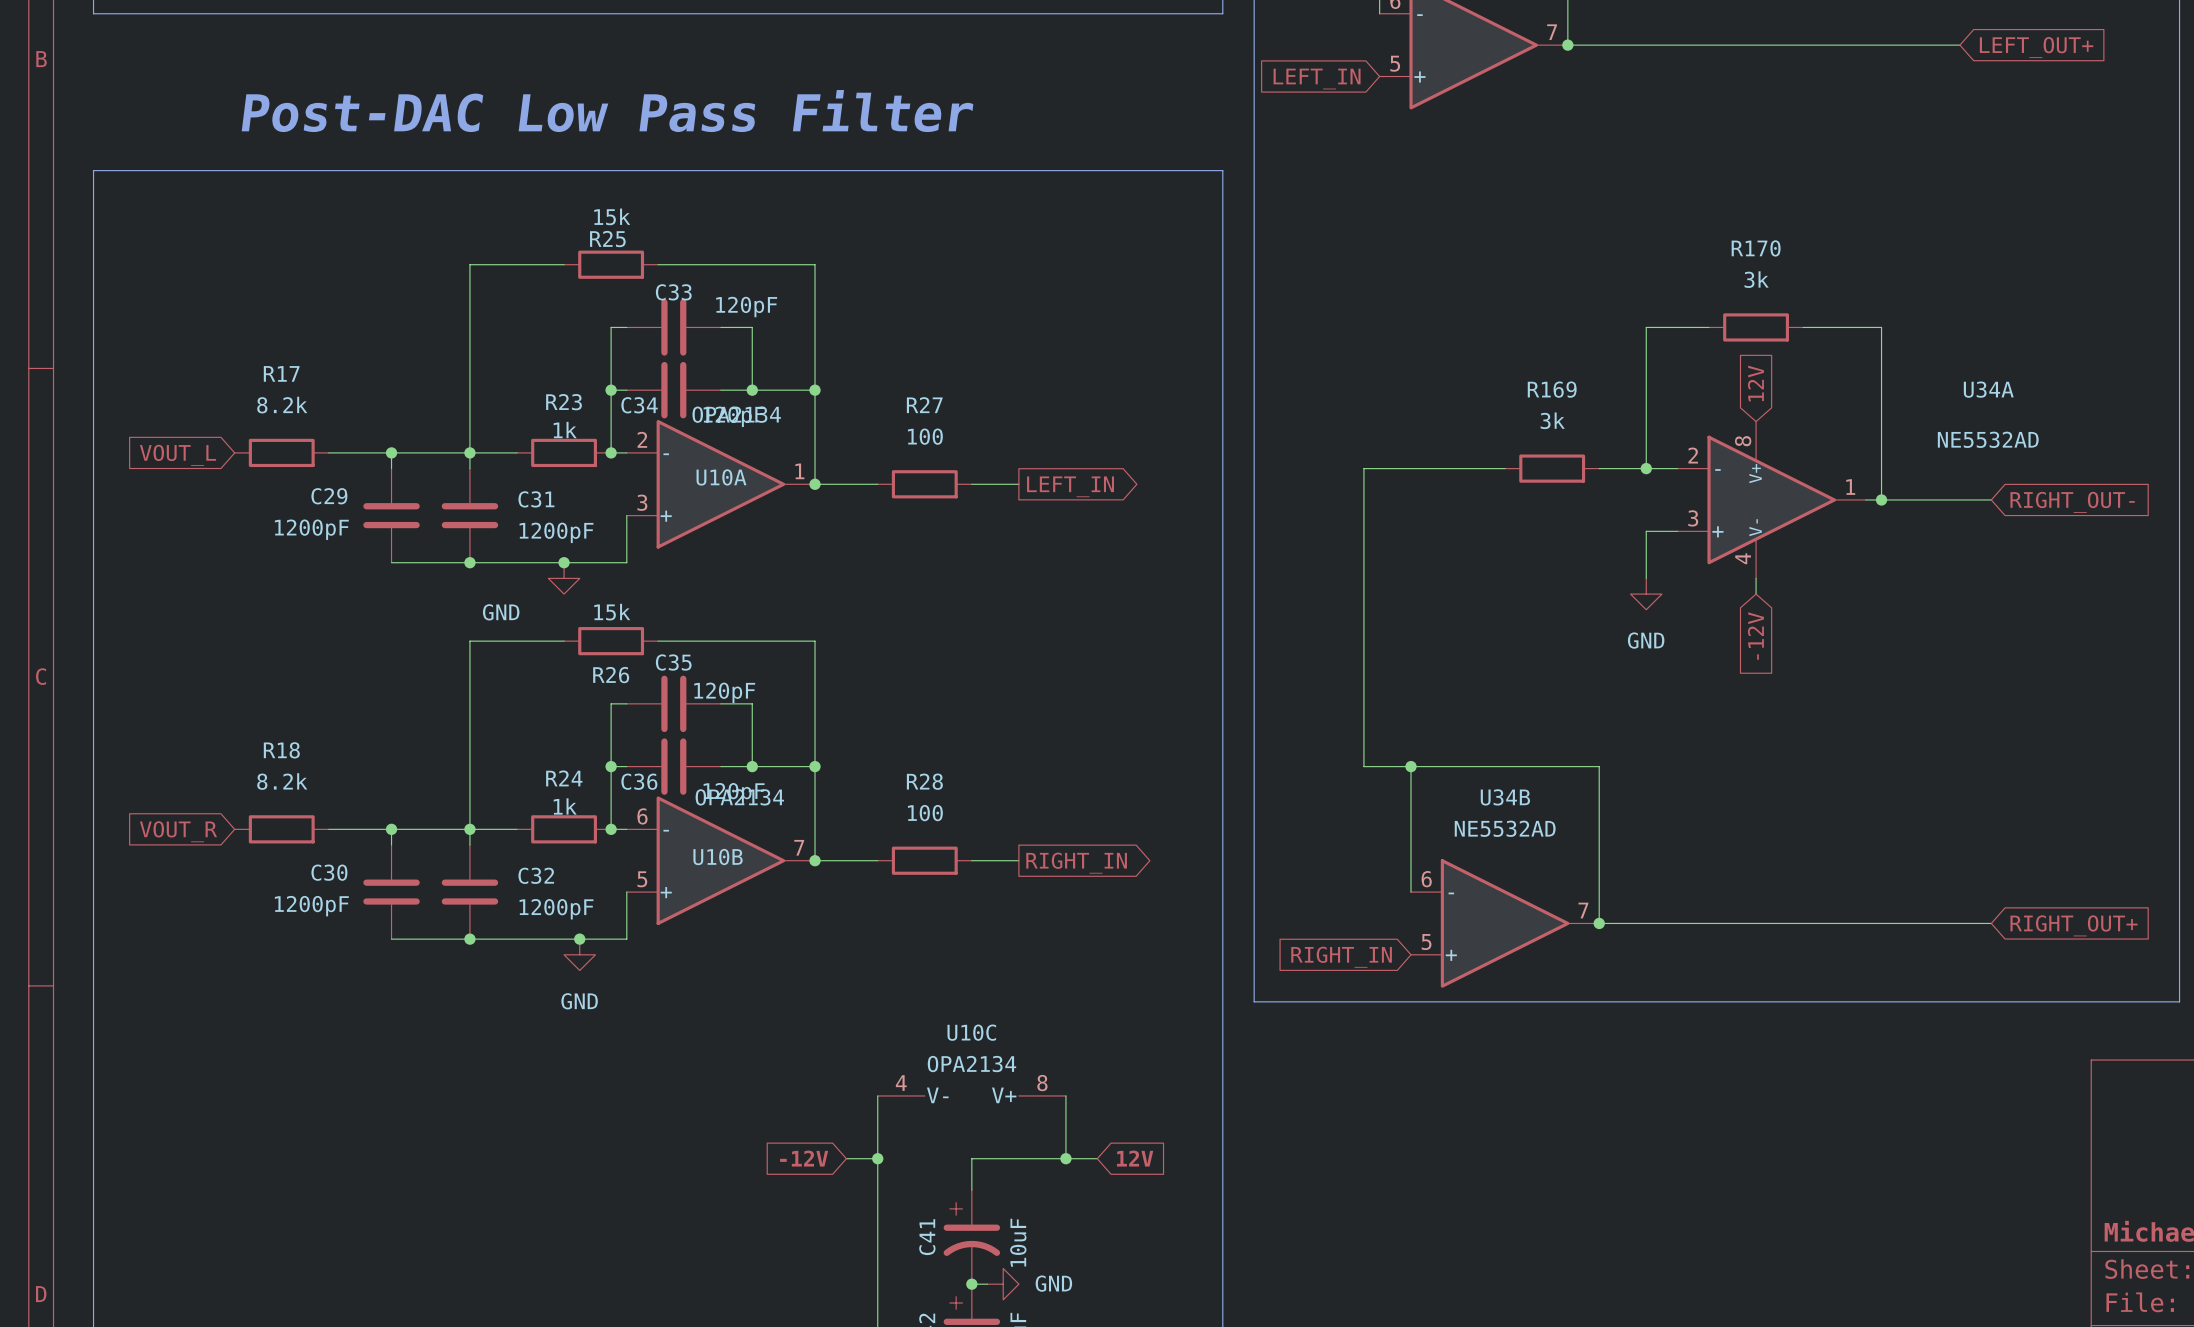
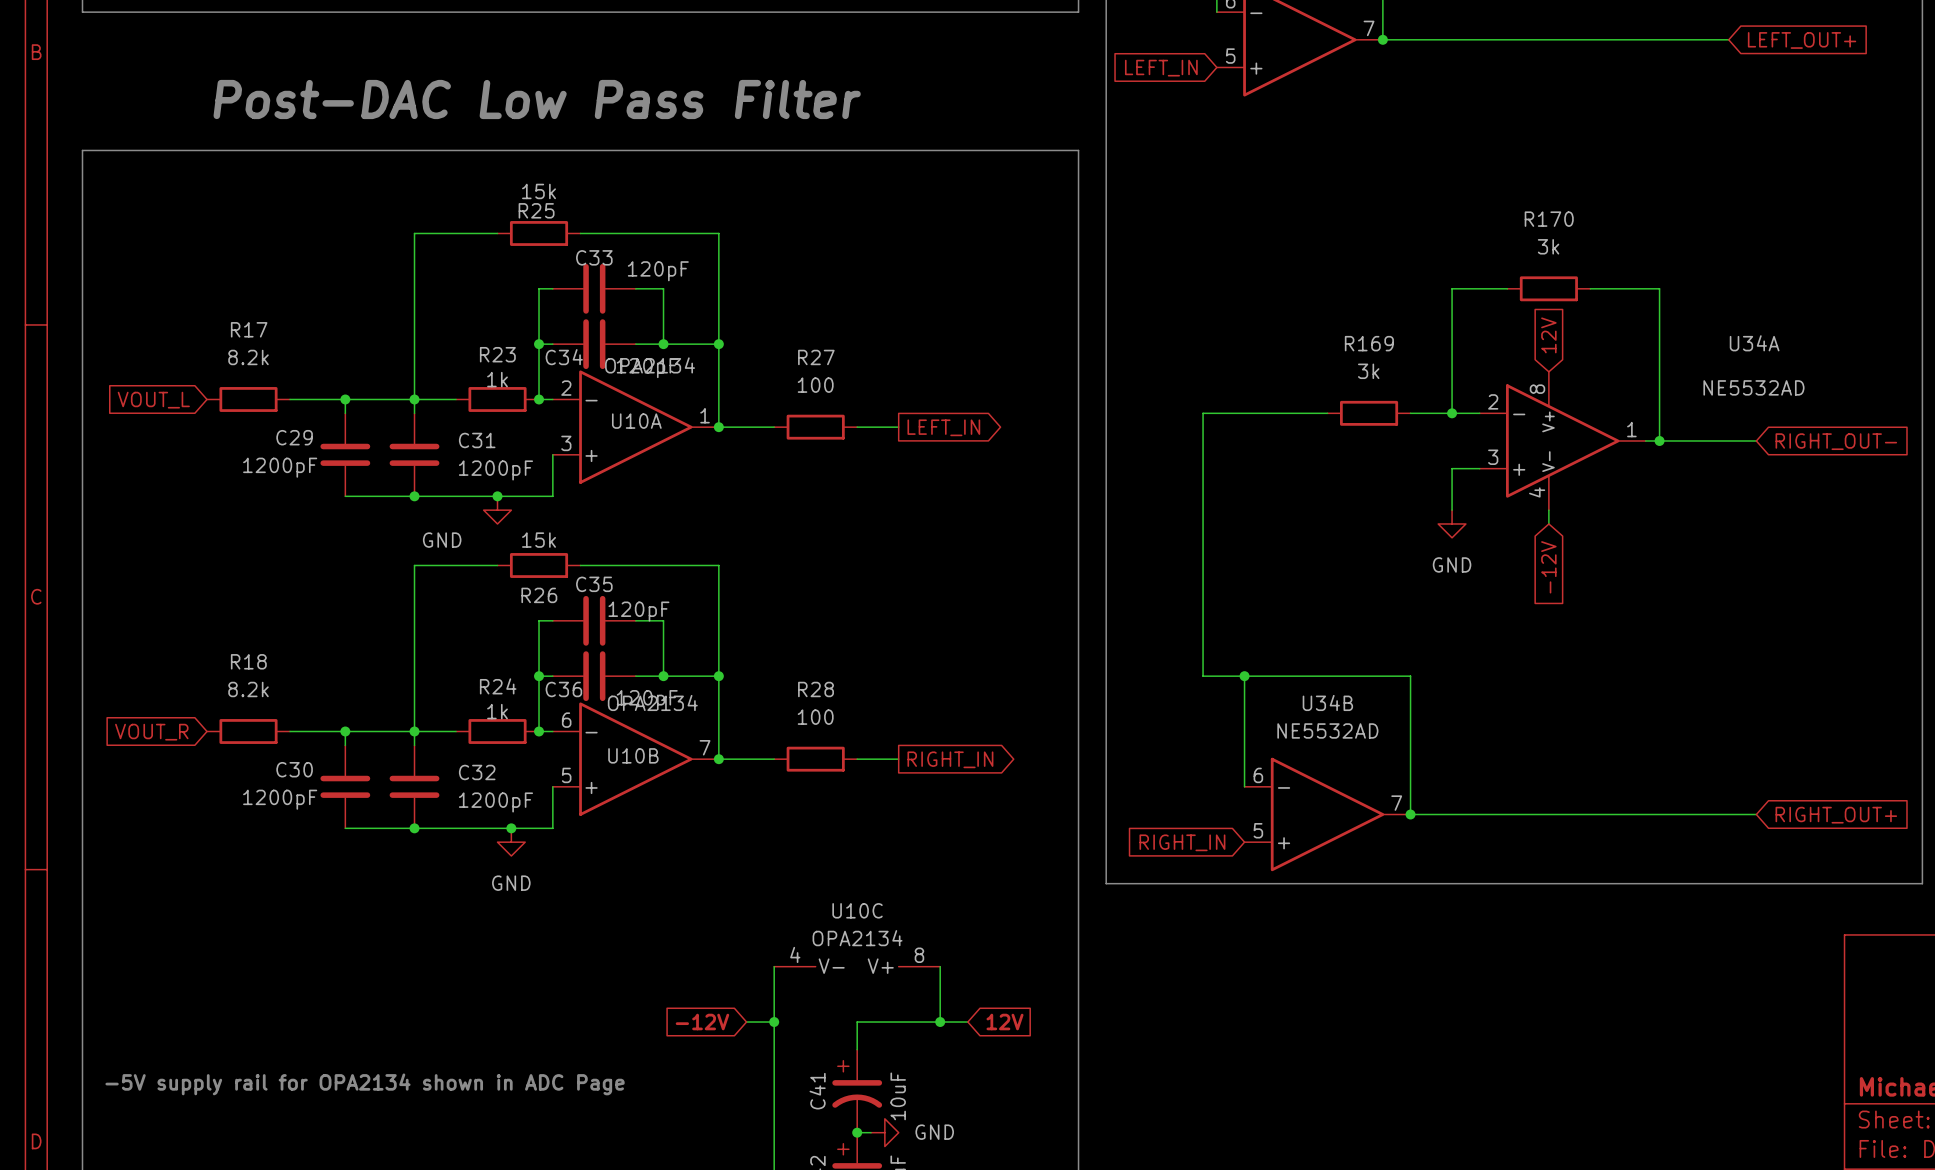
text: none -> -5V supply rail for OPA2134 shown in ADC Page (365, 1084)

